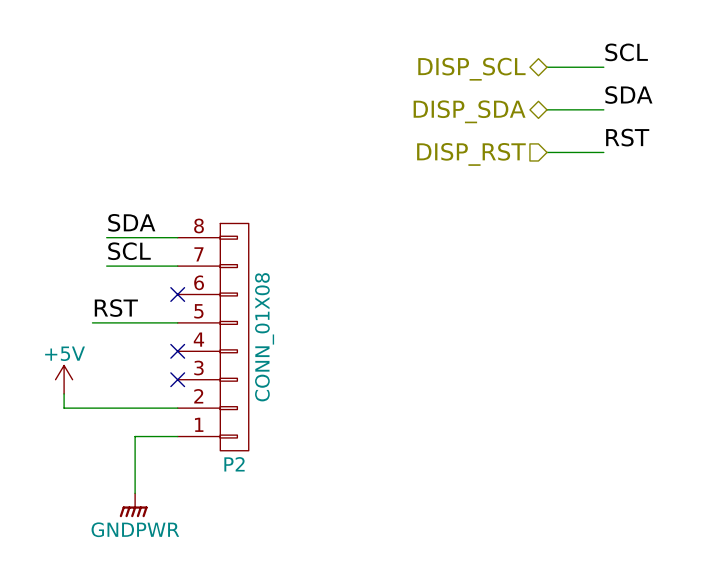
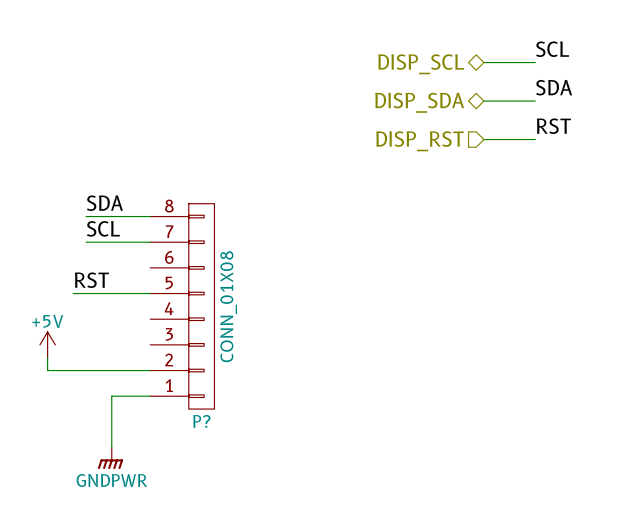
no-connect mark: (177, 294) -> none
no-connect mark: (177, 351) -> none
no-connect mark: (177, 379) -> none
P2 name: P2 (234, 464) -> P? (201, 421)

